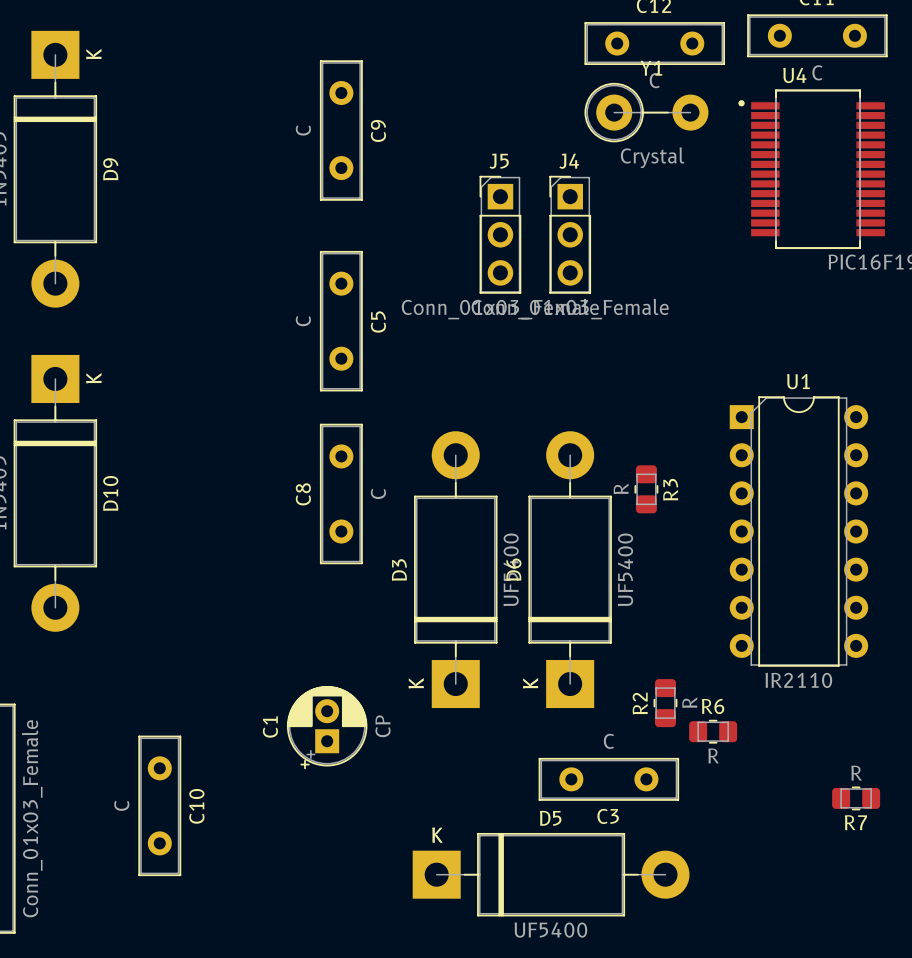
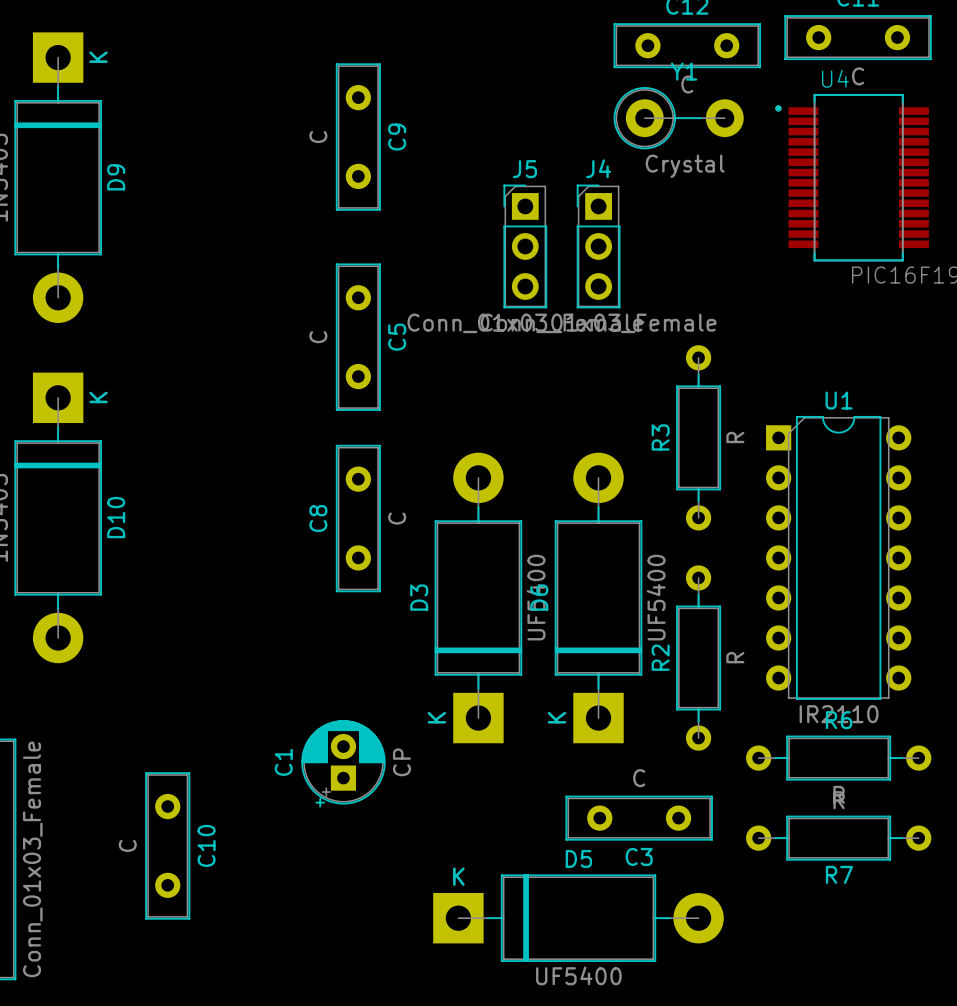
R3 footprint: [634, 465, 659, 514] -> [676, 345, 722, 531]
R3 value position: R (621, 488) -> R (735, 437)
R3 name position: R3 (670, 489) -> R3 (660, 437)
R2 footprint: [653, 679, 678, 728] -> [676, 565, 722, 751]
R6 footprint: [689, 719, 738, 744] -> [746, 735, 932, 781]
R7 footprint: [832, 786, 881, 811] -> [746, 815, 932, 861]

